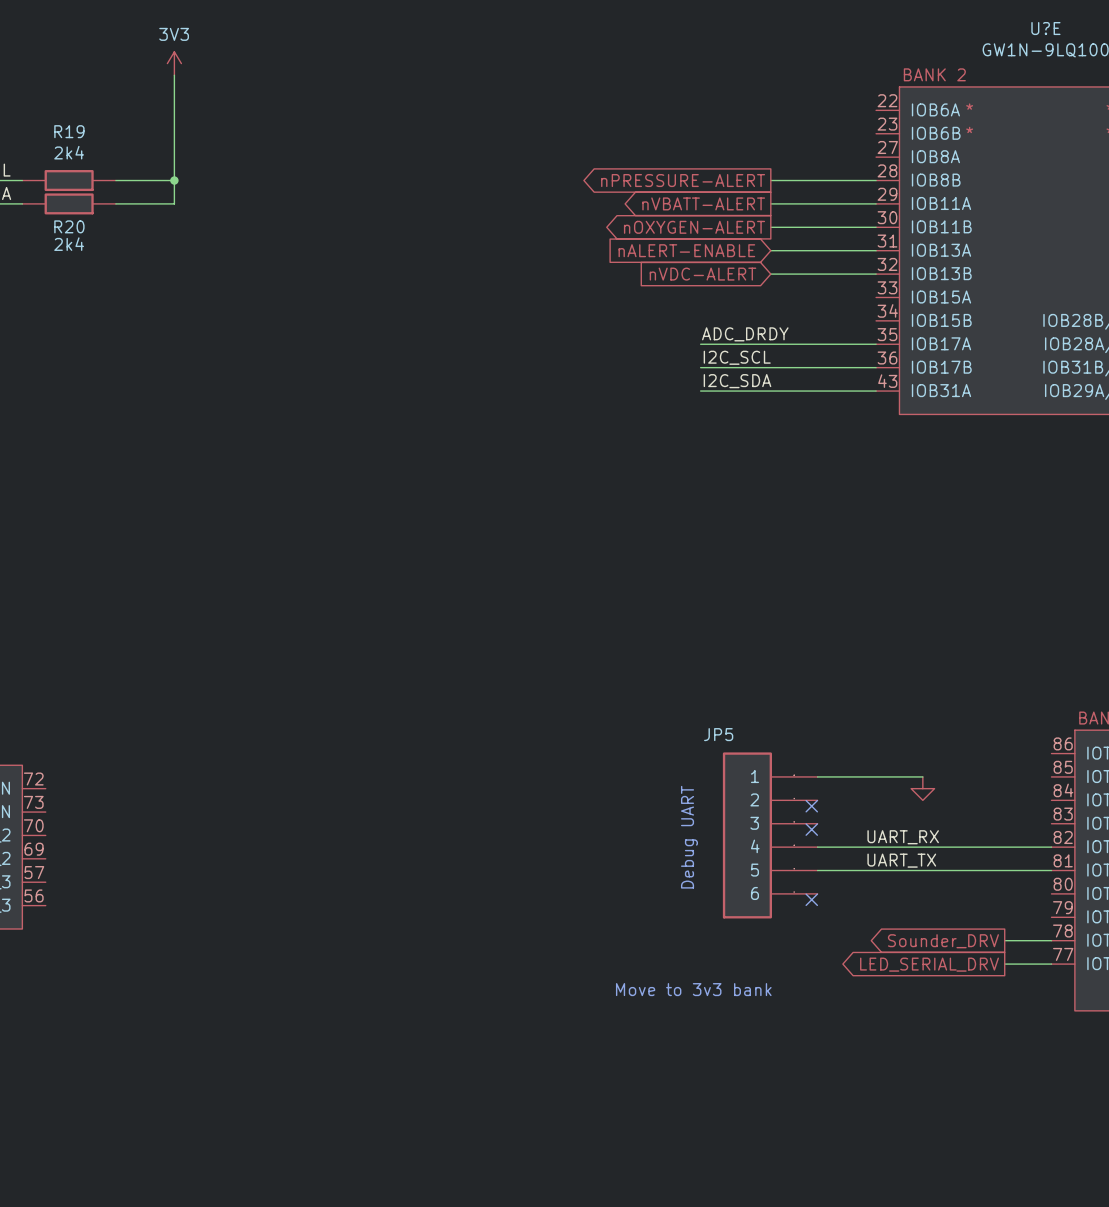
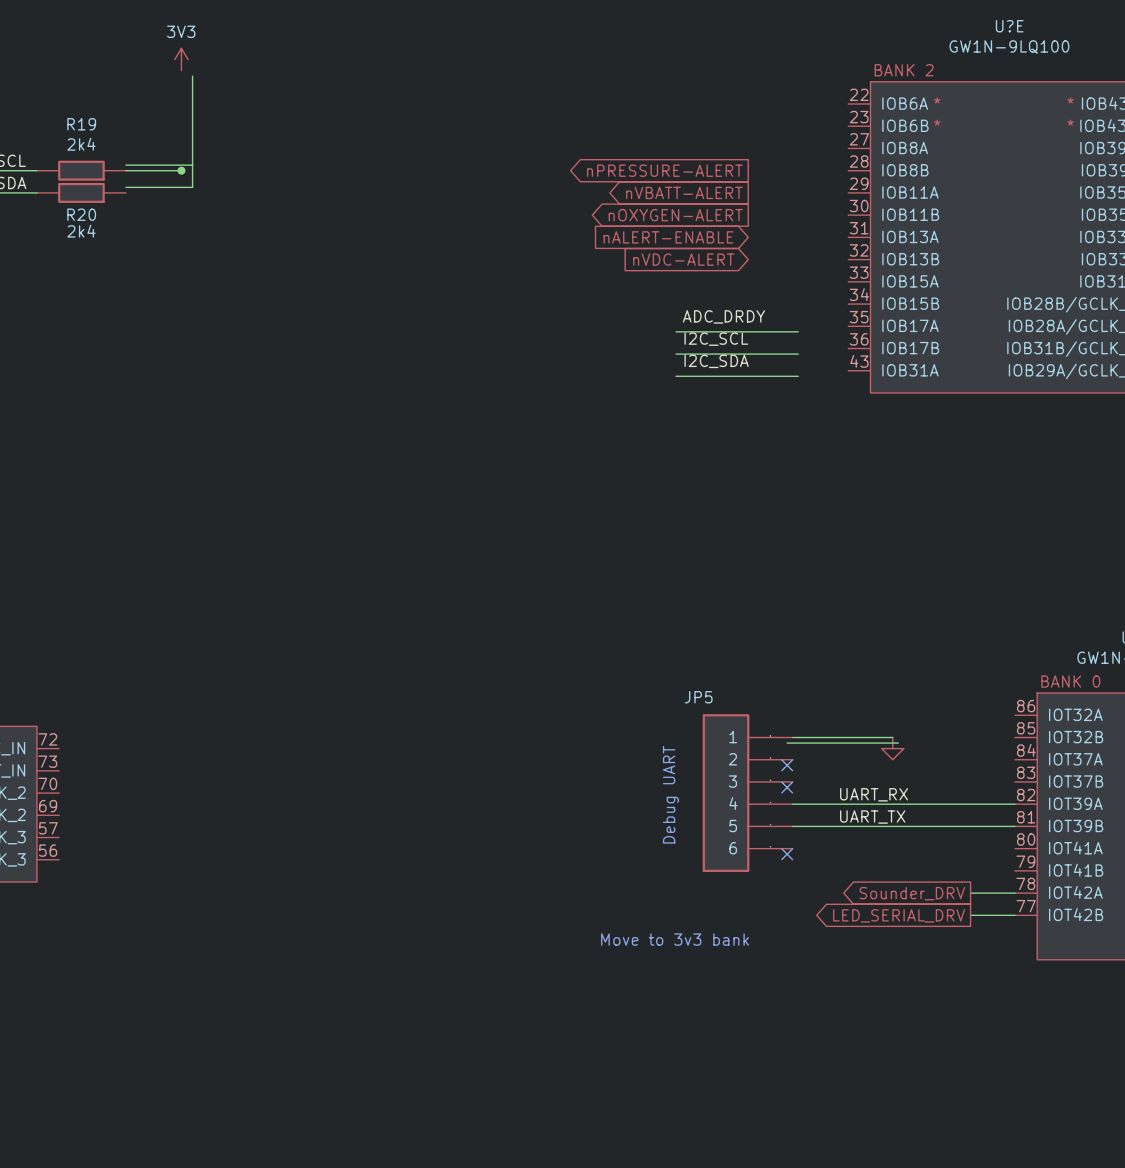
wire: (174, 75) (174, 203) (115, 203) -> none
wire: none -> (192, 76) (192, 187) (125, 187)
wire: none -> (125, 165) (192, 165)
wire: (770, 180) (876, 180) -> none
wire: (770, 203) (876, 203) -> none
wire: (770, 227) (876, 227) -> none
wire: (770, 250) (876, 250) -> none
wire: (770, 274) (876, 274) -> none
wire: (700, 344) (876, 344) -> none
wire: none -> (676, 331) (798, 331)
wire: (700, 367) (876, 367) -> none
wire: none -> (676, 354) (798, 354)
wire: (700, 391) (876, 391) -> none
wire: none -> (676, 376) (798, 376)
wire: none -> (787, 743) (898, 743)

